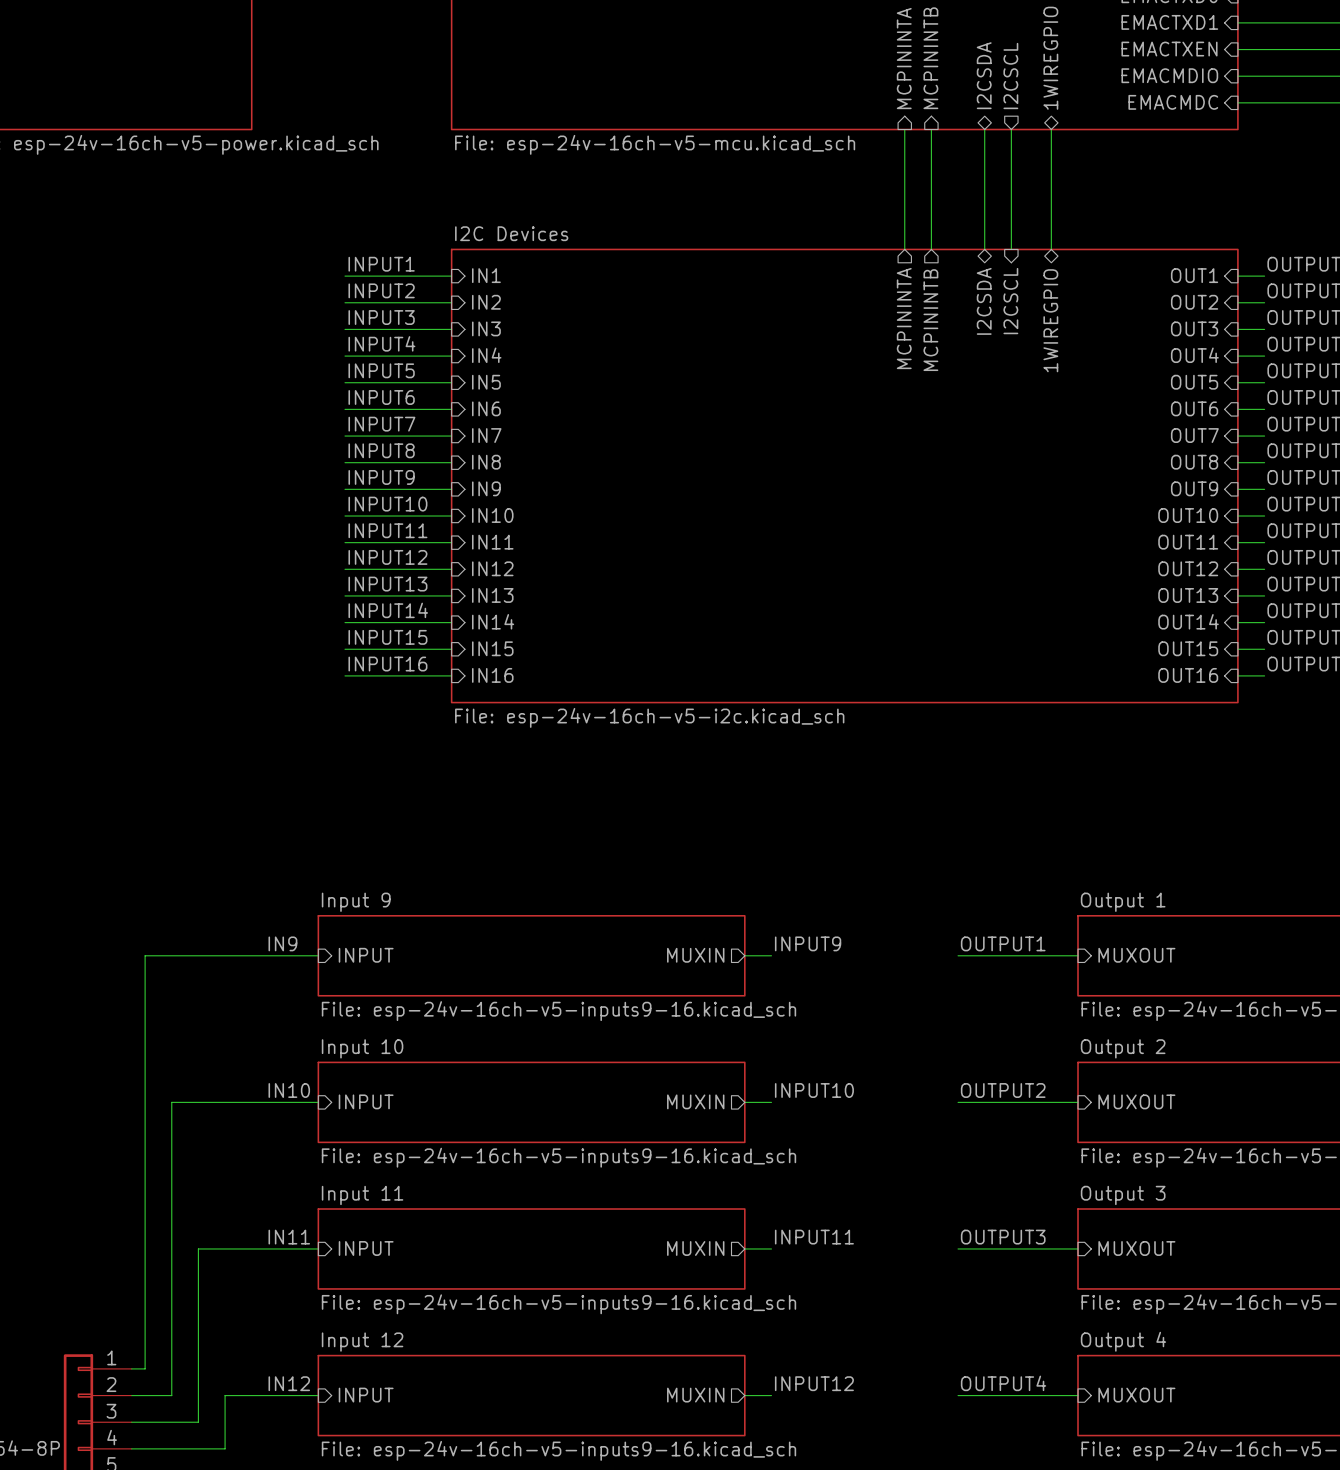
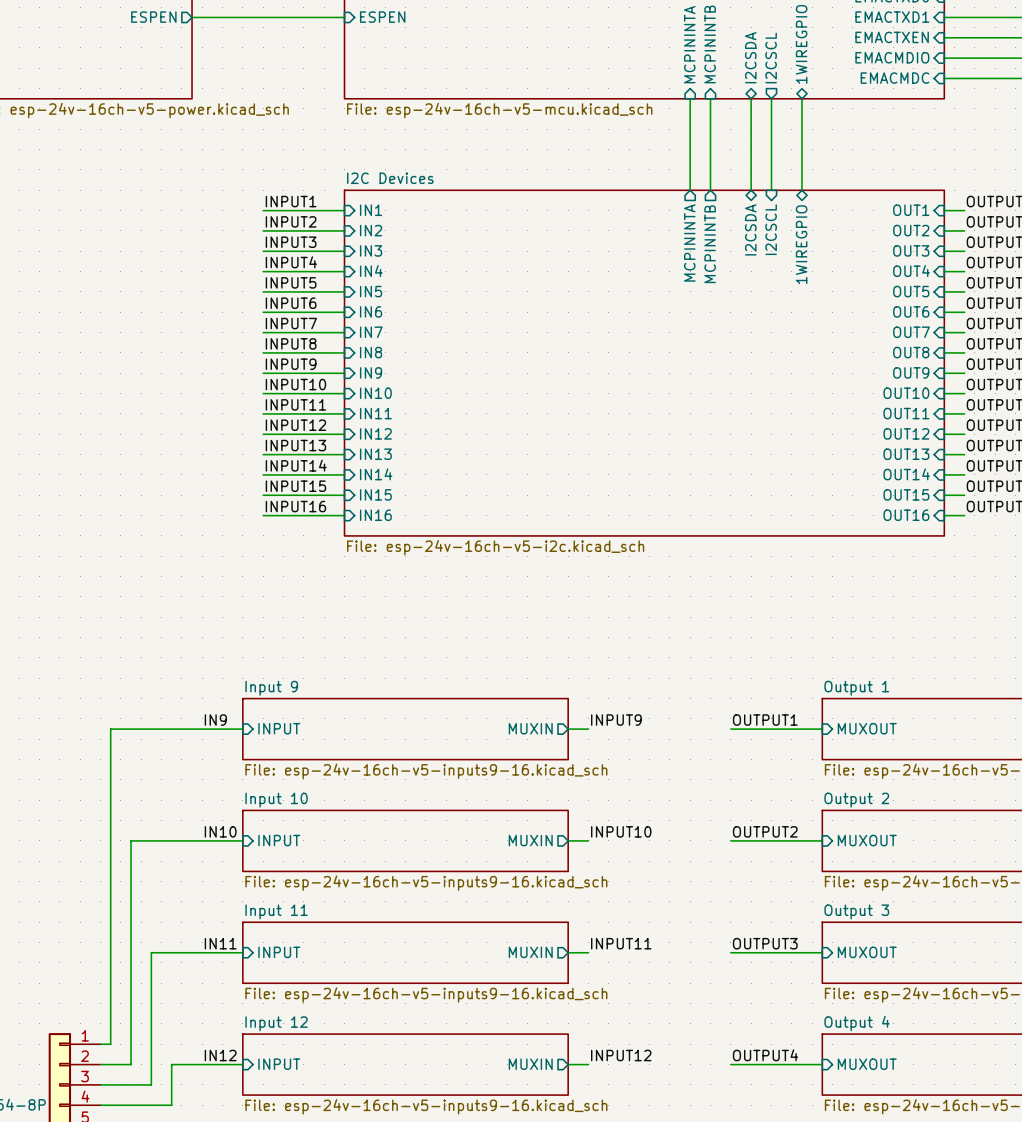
sheet pin: none -> ESPEN (153, 17)
wire: none -> (192, 17) (344, 17)
sheet pin: none -> ESPEN (382, 17)

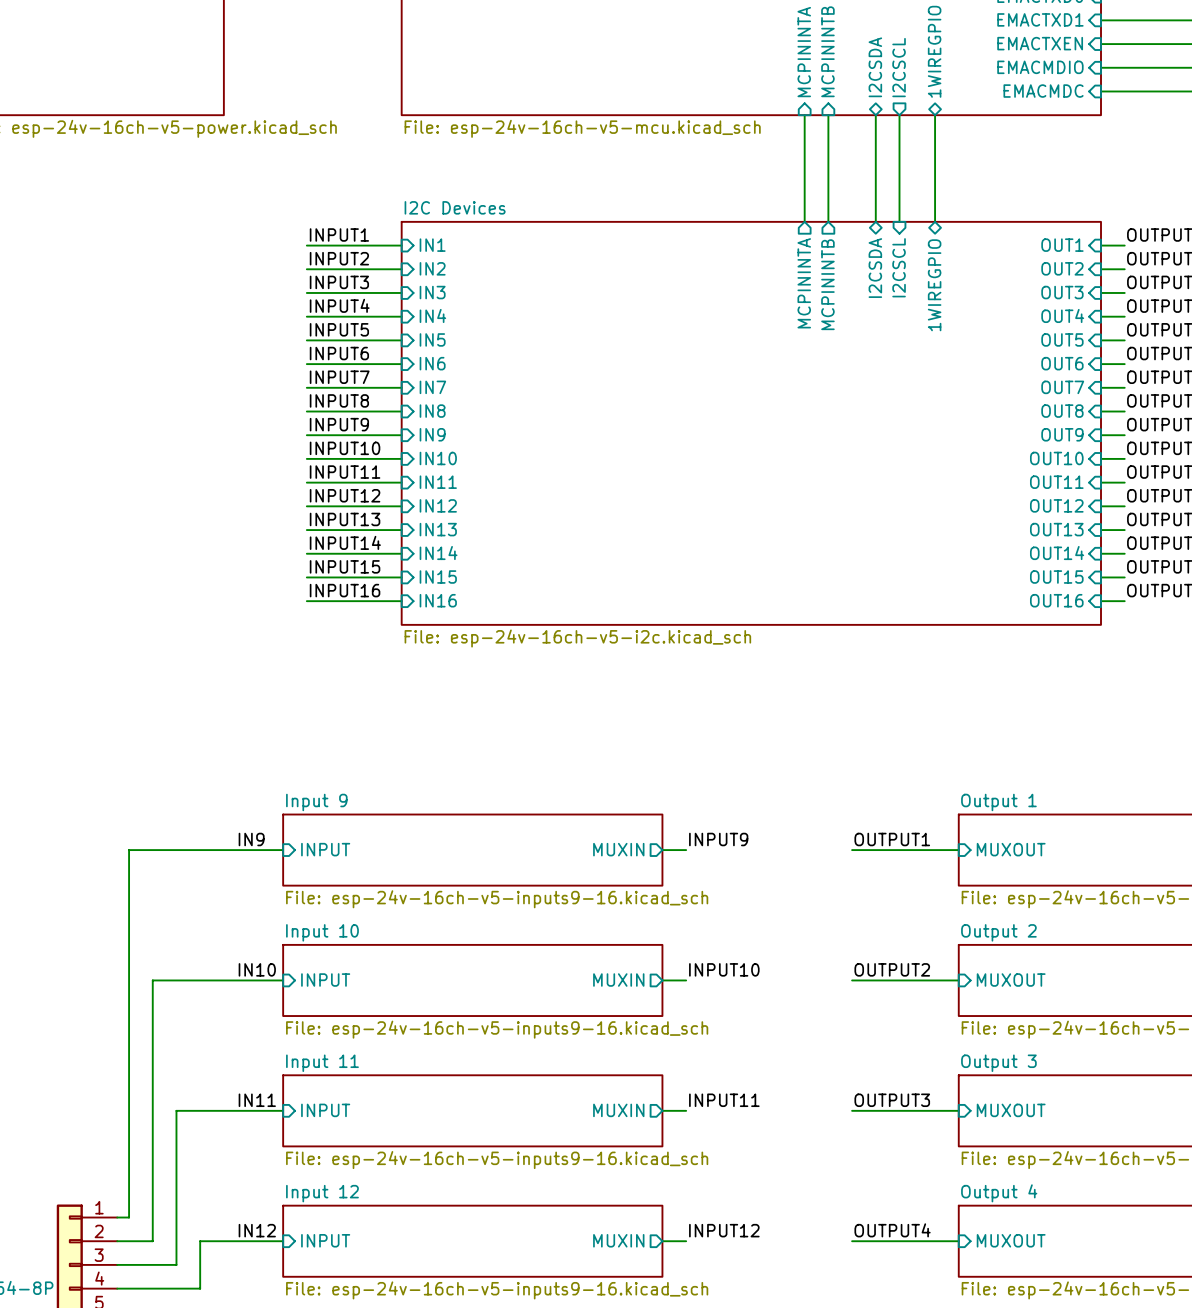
sheet pin: ESPEN (153, 17) -> none
wire: (192, 17) (344, 17) -> none
sheet pin: ESPEN (382, 17) -> none

